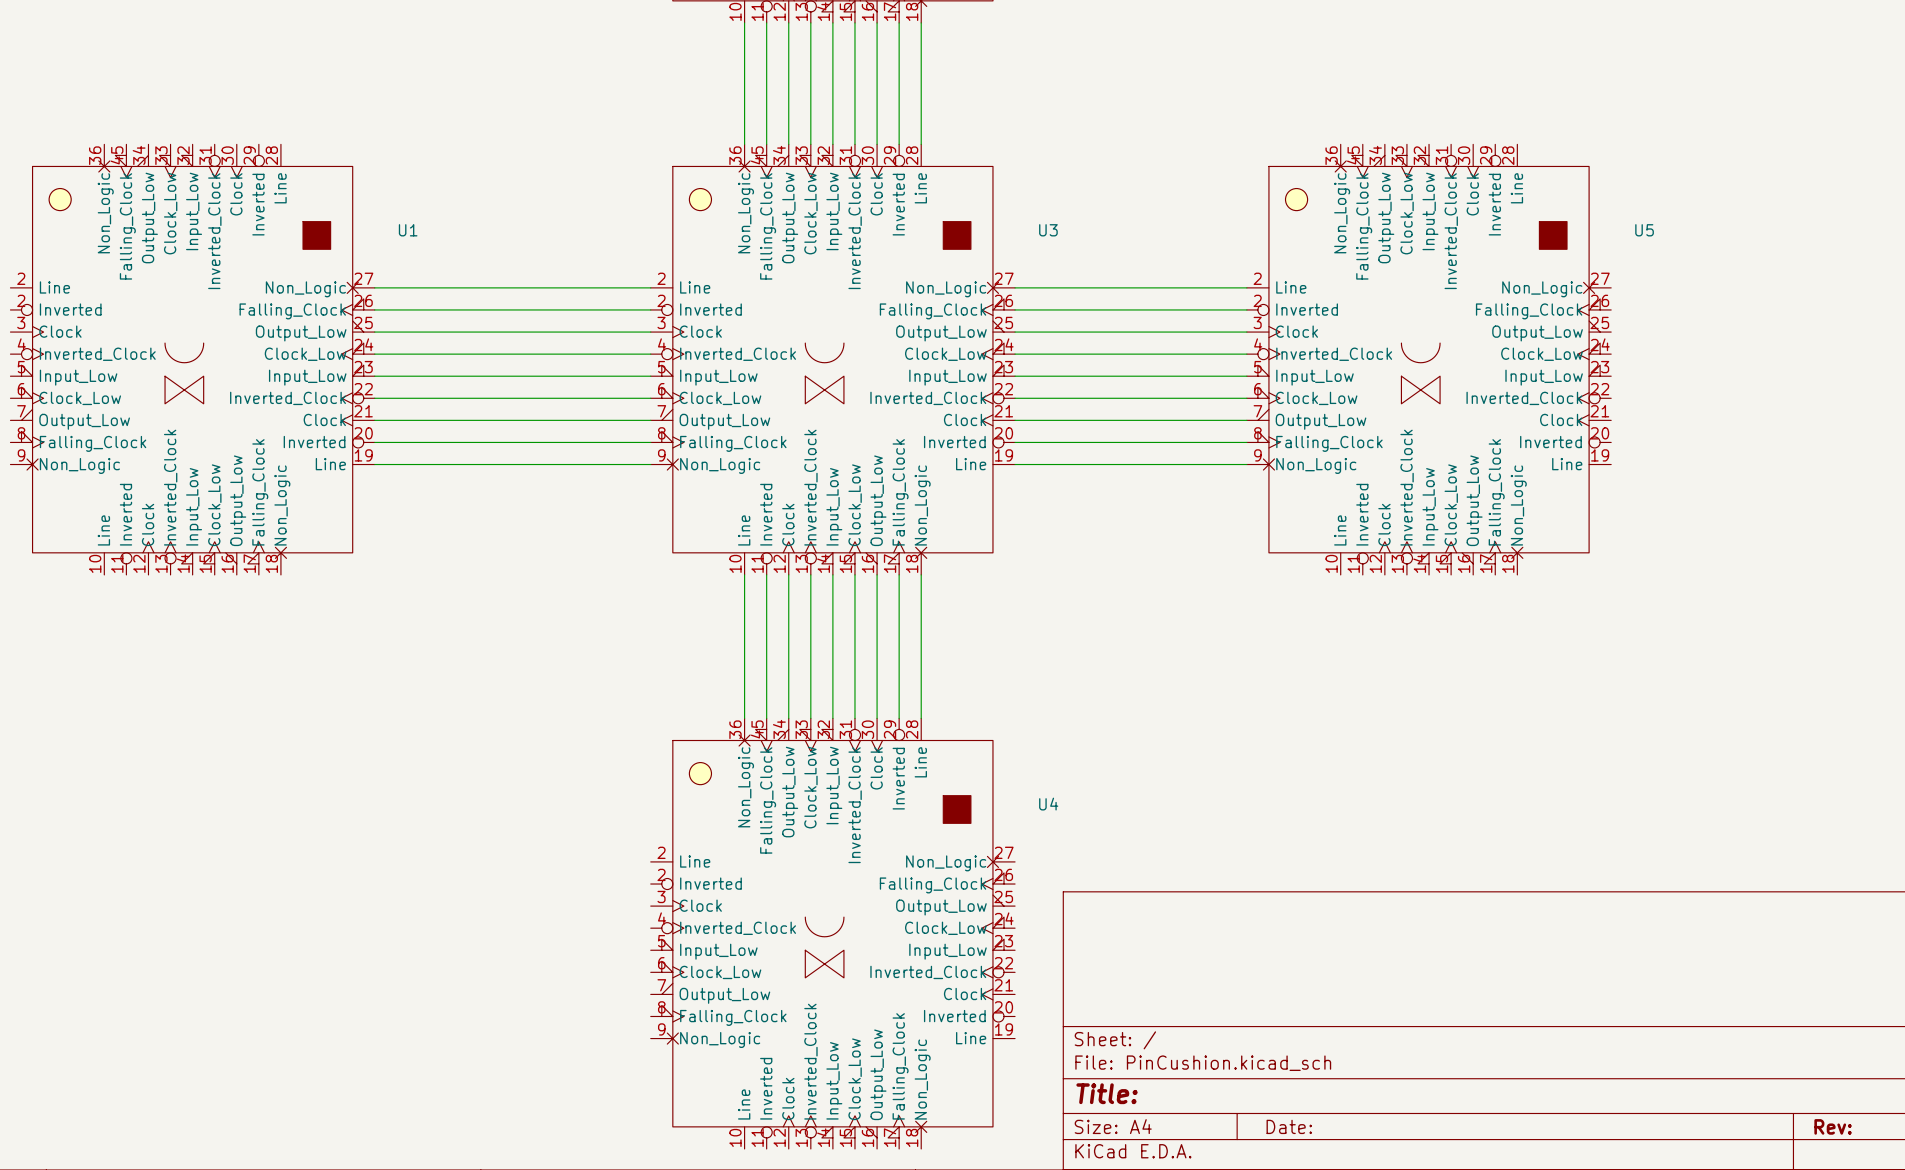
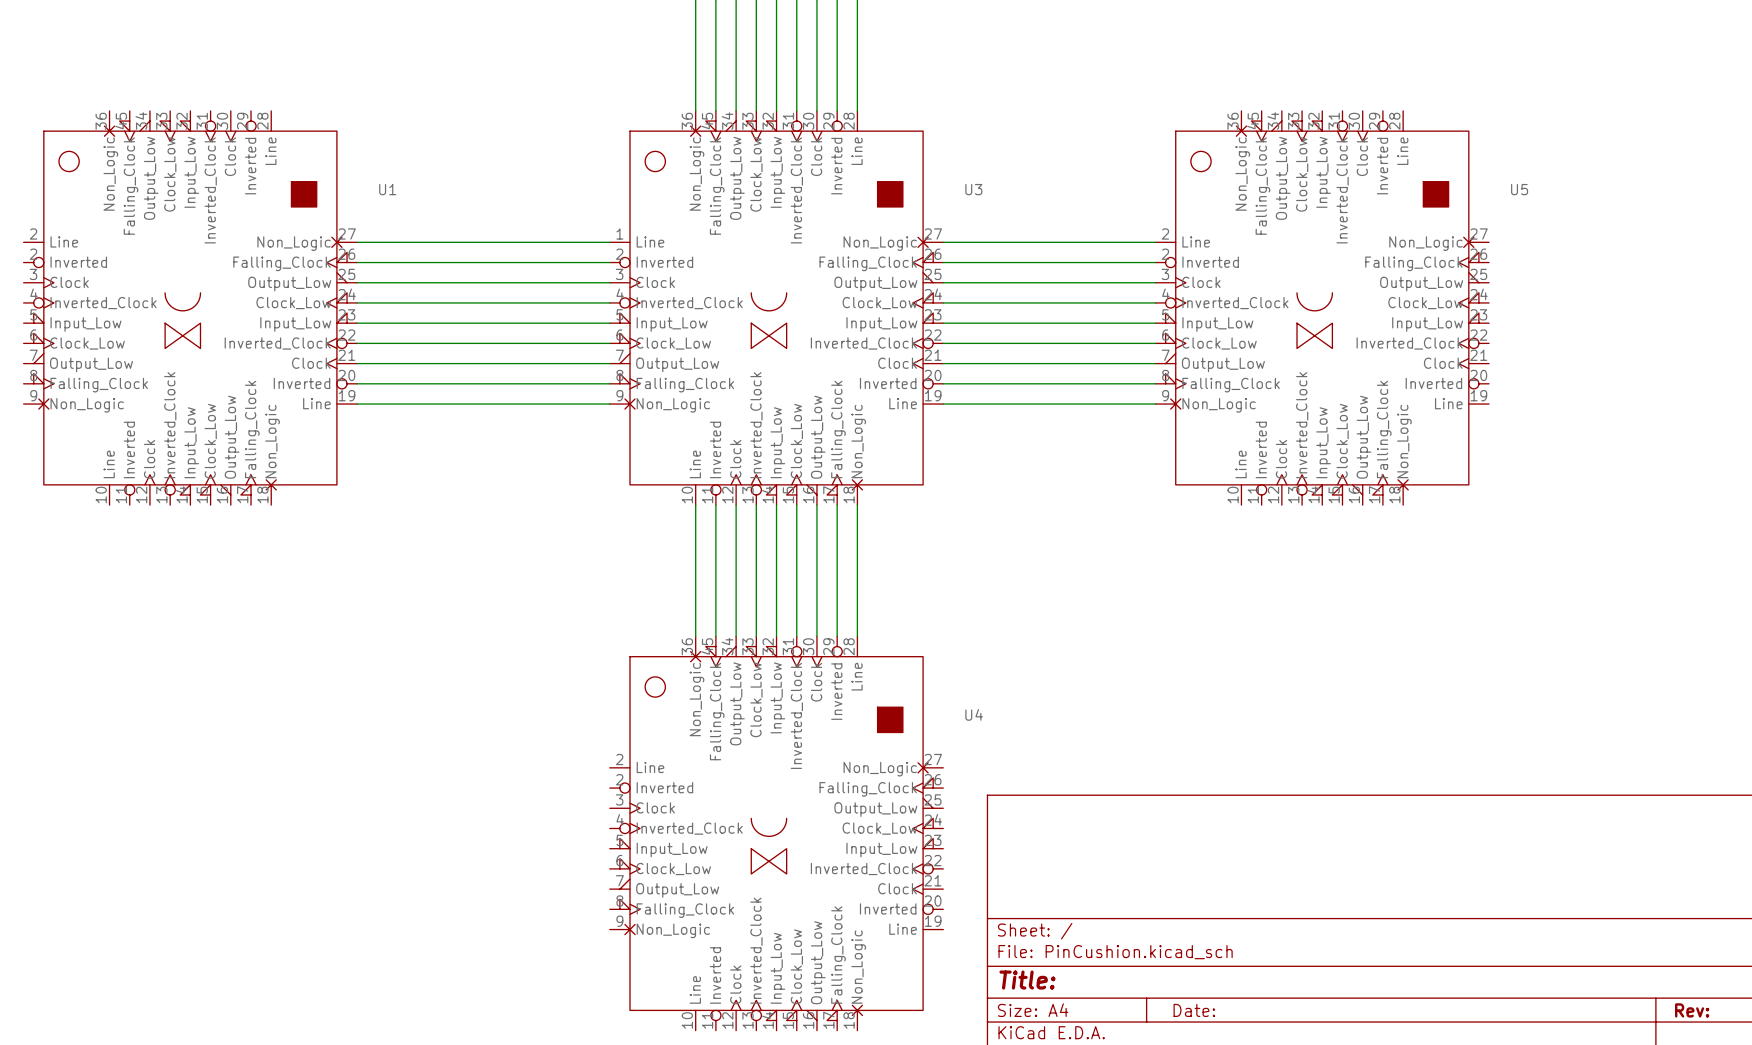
U3 pin number: 2 (661, 278) -> 1 (619, 233)

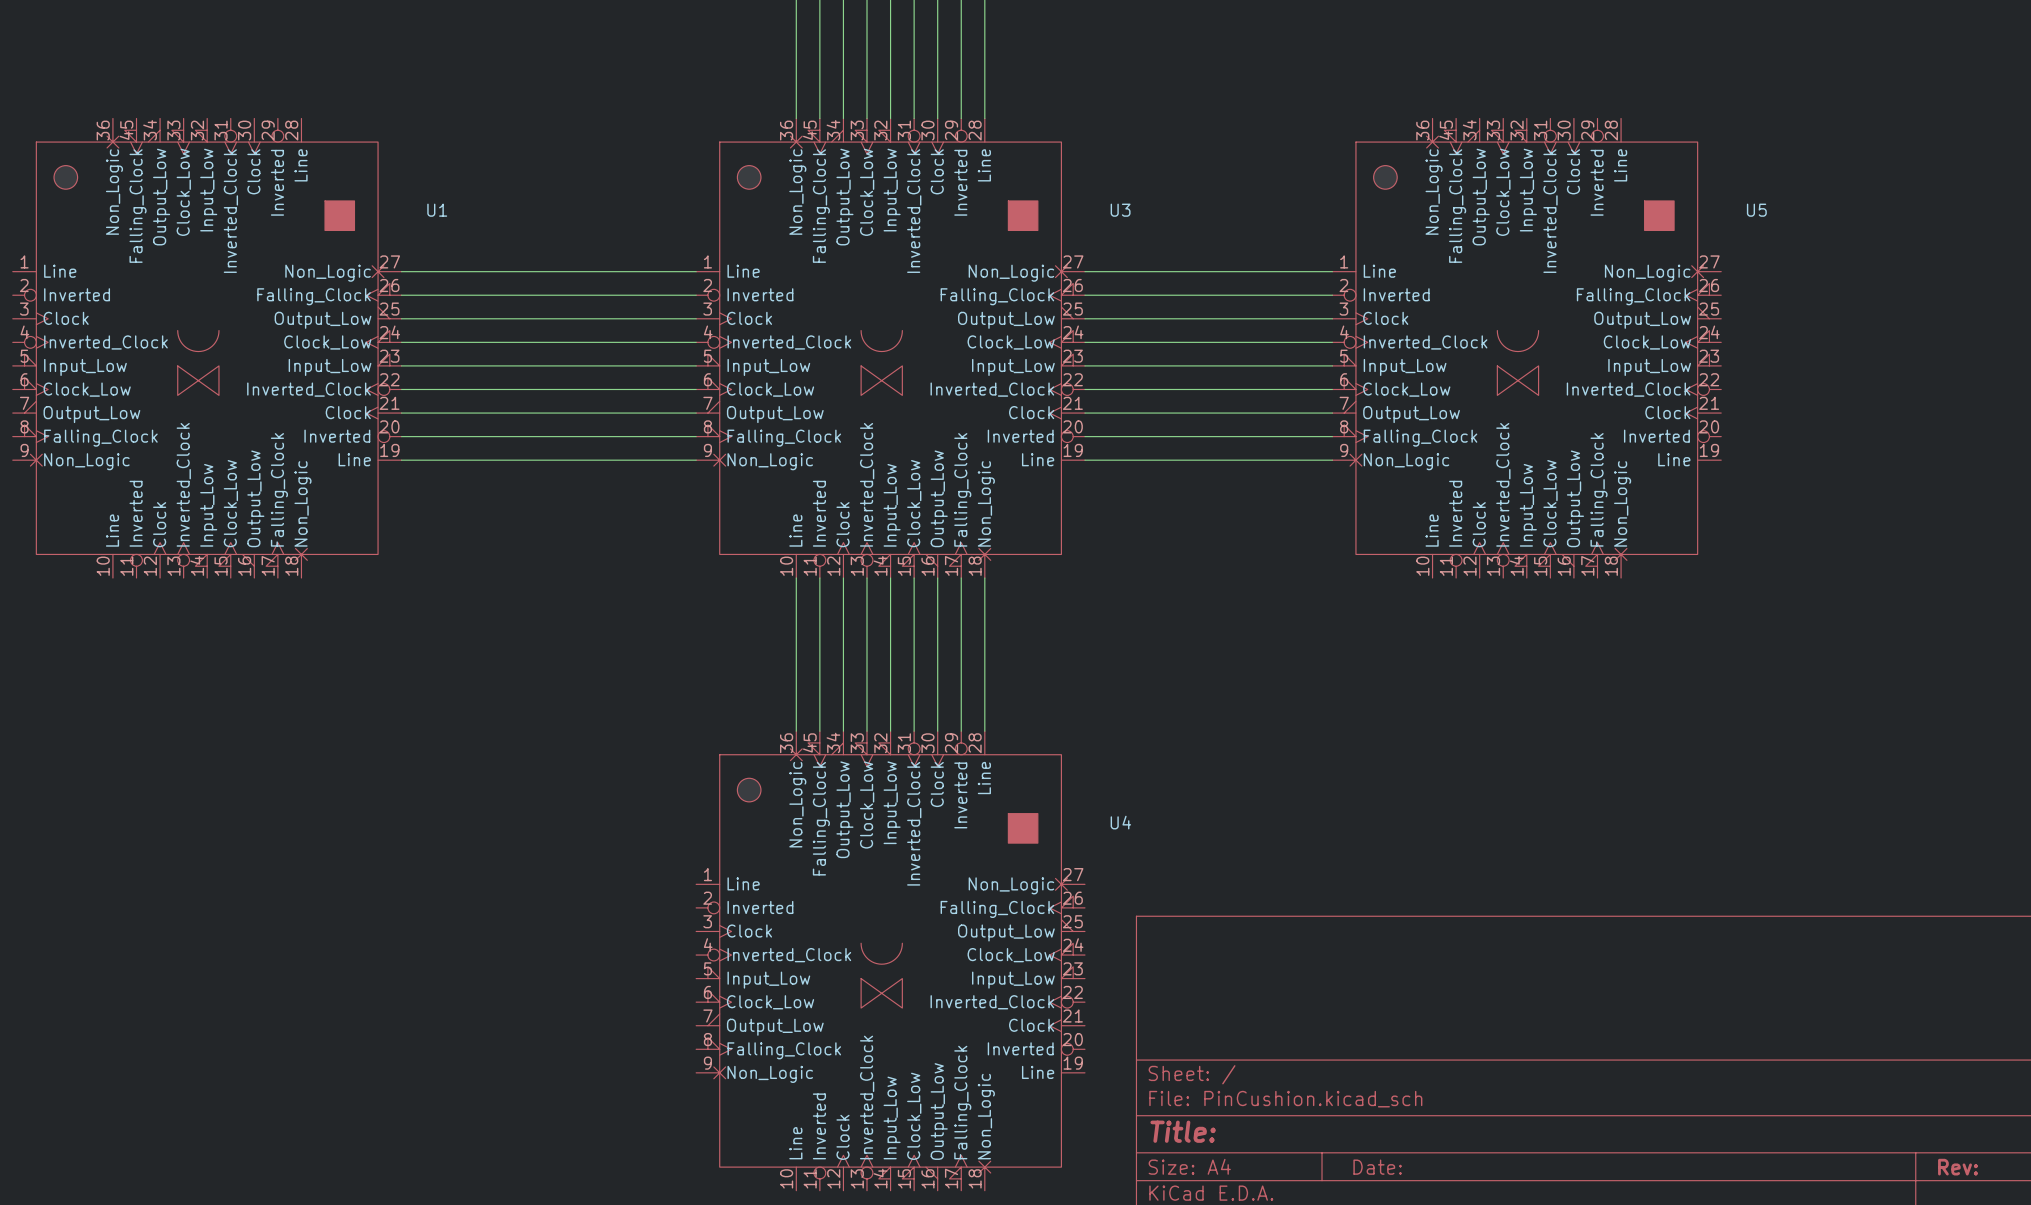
U1 pin number: 2 (33, 233) -> 1 (24, 261)
U5 pin number: 2 (1165, 233) -> 1 (1344, 261)
U4 pin number: 2 (619, 759) -> 1 (707, 874)

